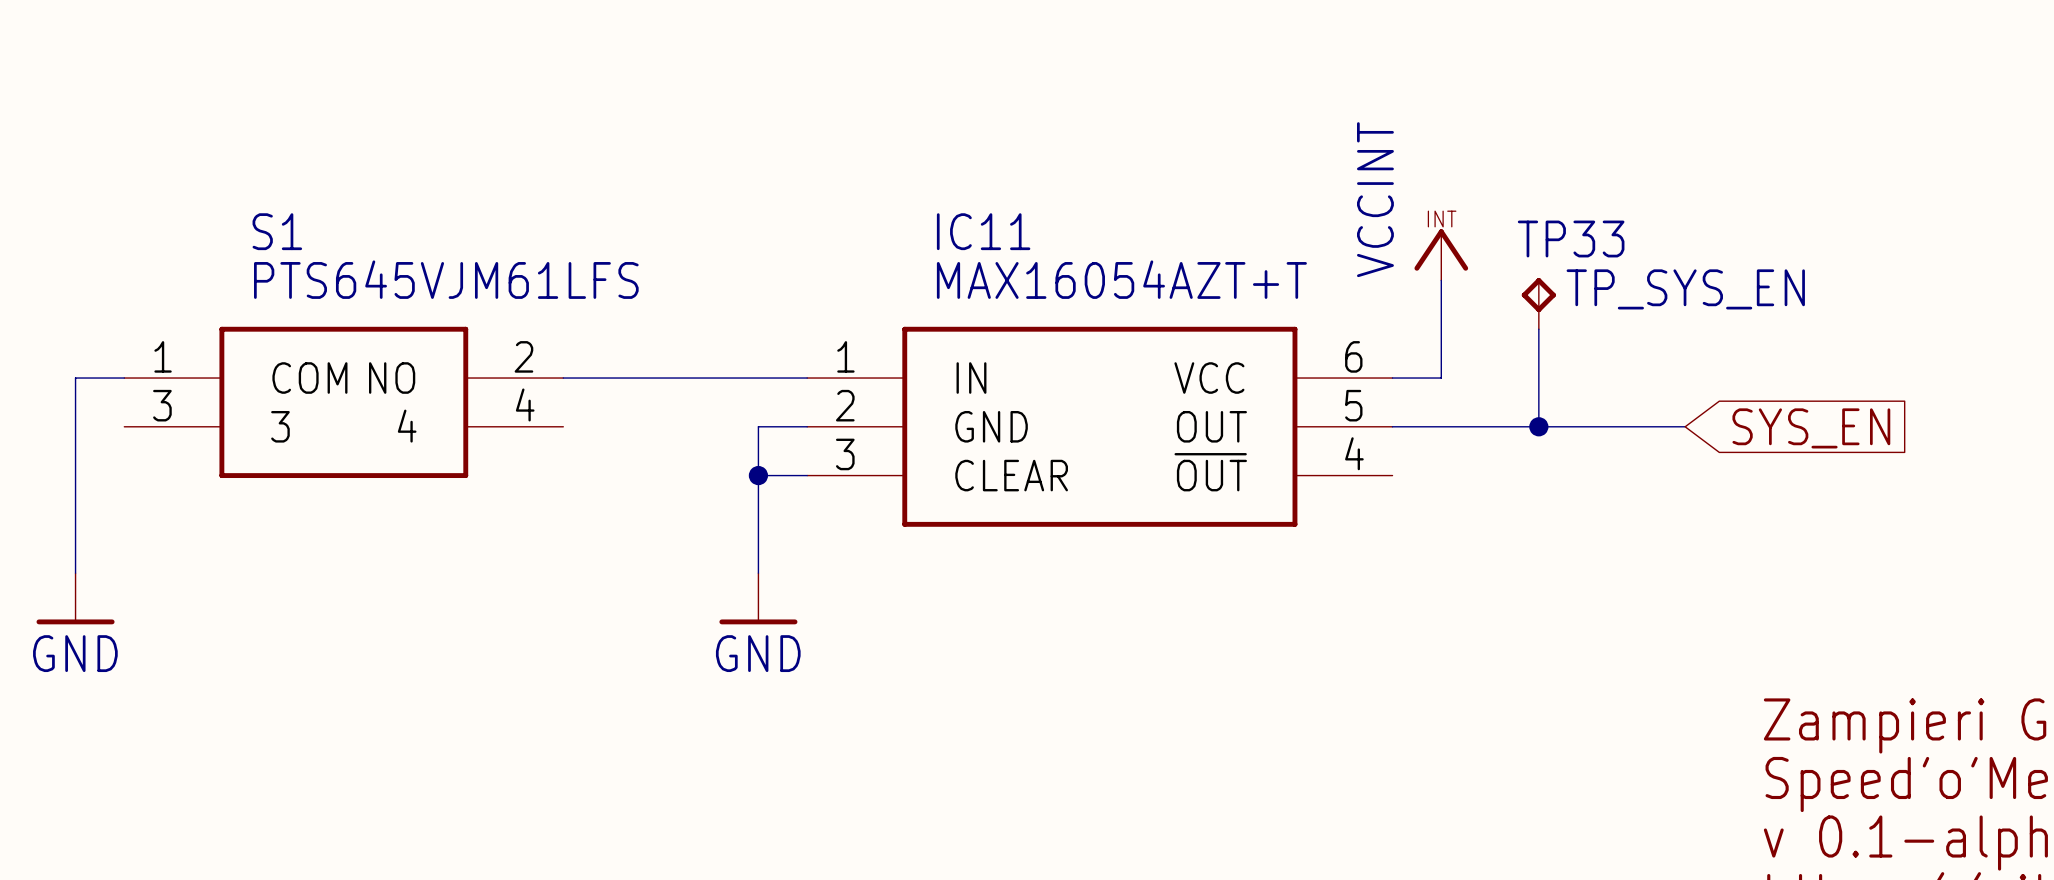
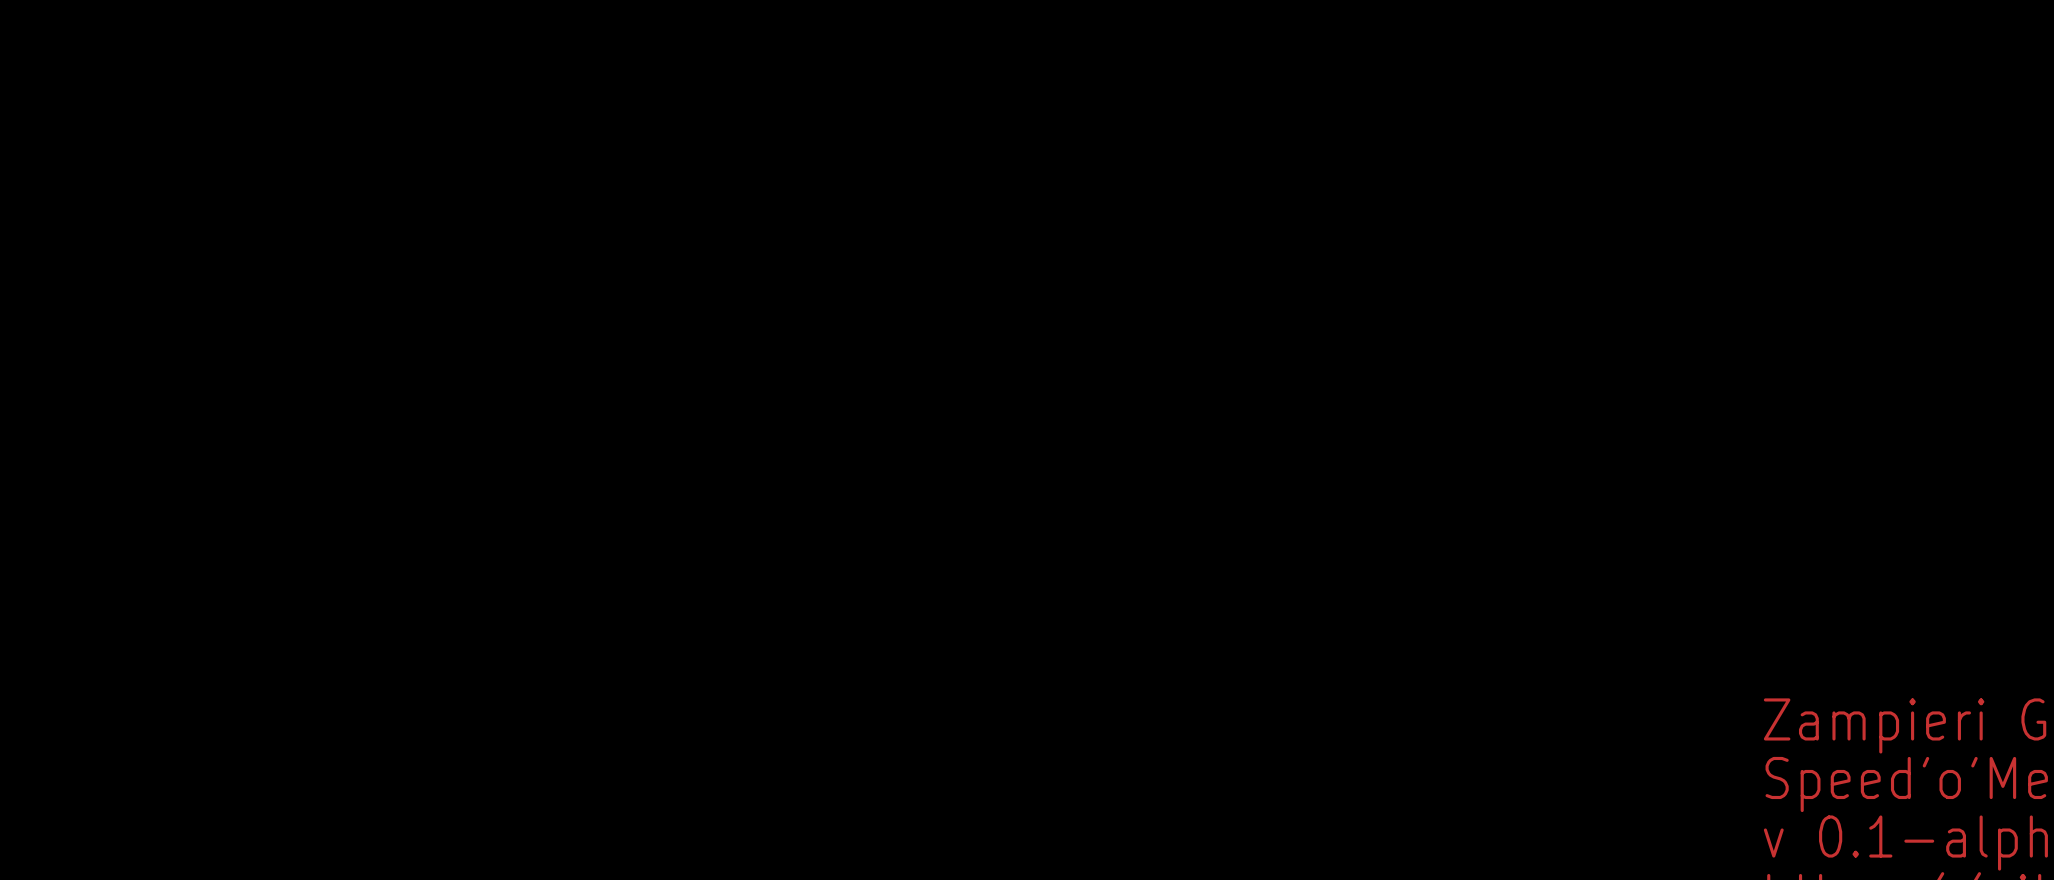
power symbol: VCCINT (1441, 254) -> none
wire: (1441, 280) (1441, 378) (1392, 378) -> none
TP33: (1538, 303) -> none
wire: (1538, 329) (1538, 426) -> none
wire: (124, 378) (75, 378) (75, 573) -> none
wire: (563, 378) (807, 378) -> none
S1: PTS645VJM61LFS (343, 402) -> none
wire: (807, 426) (758, 426) (758, 573) -> none
IC11: MAX16054AZT+T (1099, 426) -> none
wire: (1392, 426) (1685, 426) -> none
junction: (1538, 426) -> none
global label: SYS_EN (1811, 428) -> none
wire: (758, 475) (807, 475) -> none
junction: (758, 475) -> none
power symbol: GND (75, 598) -> none
power symbol: GND (758, 598) -> none

